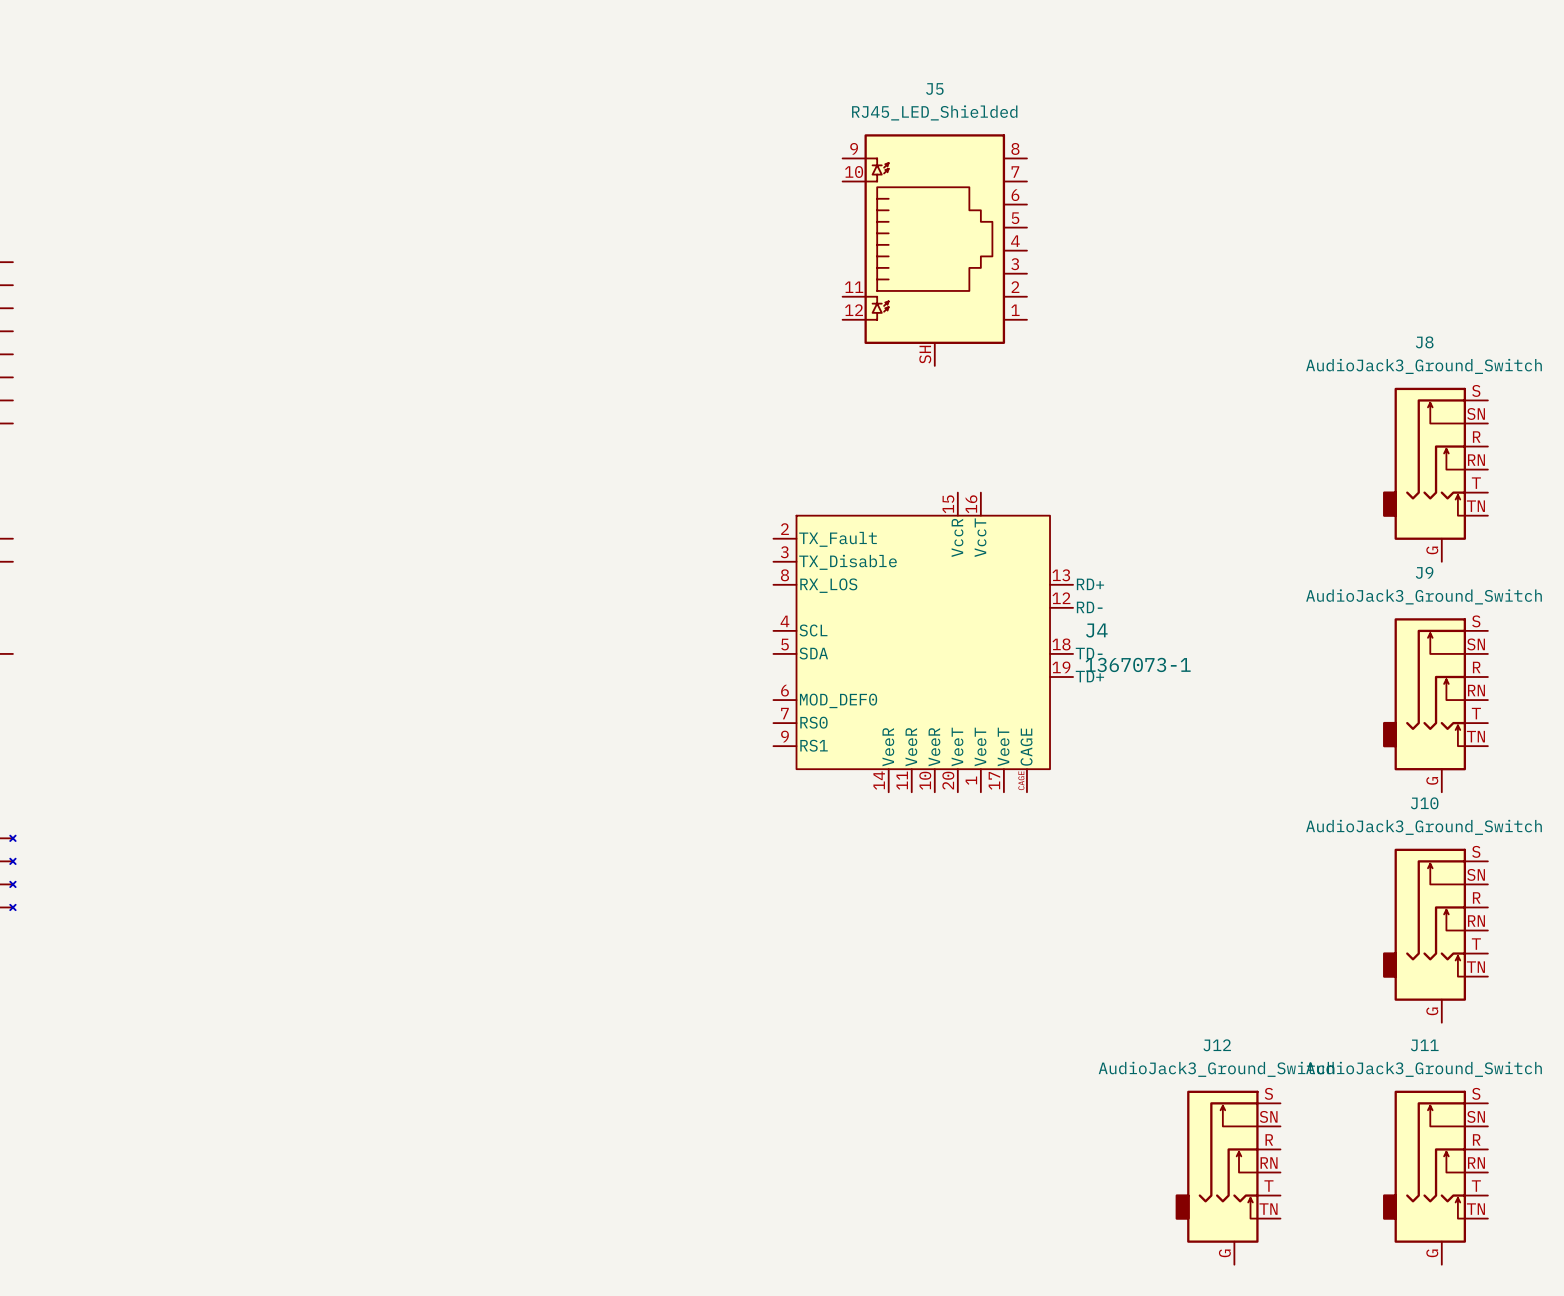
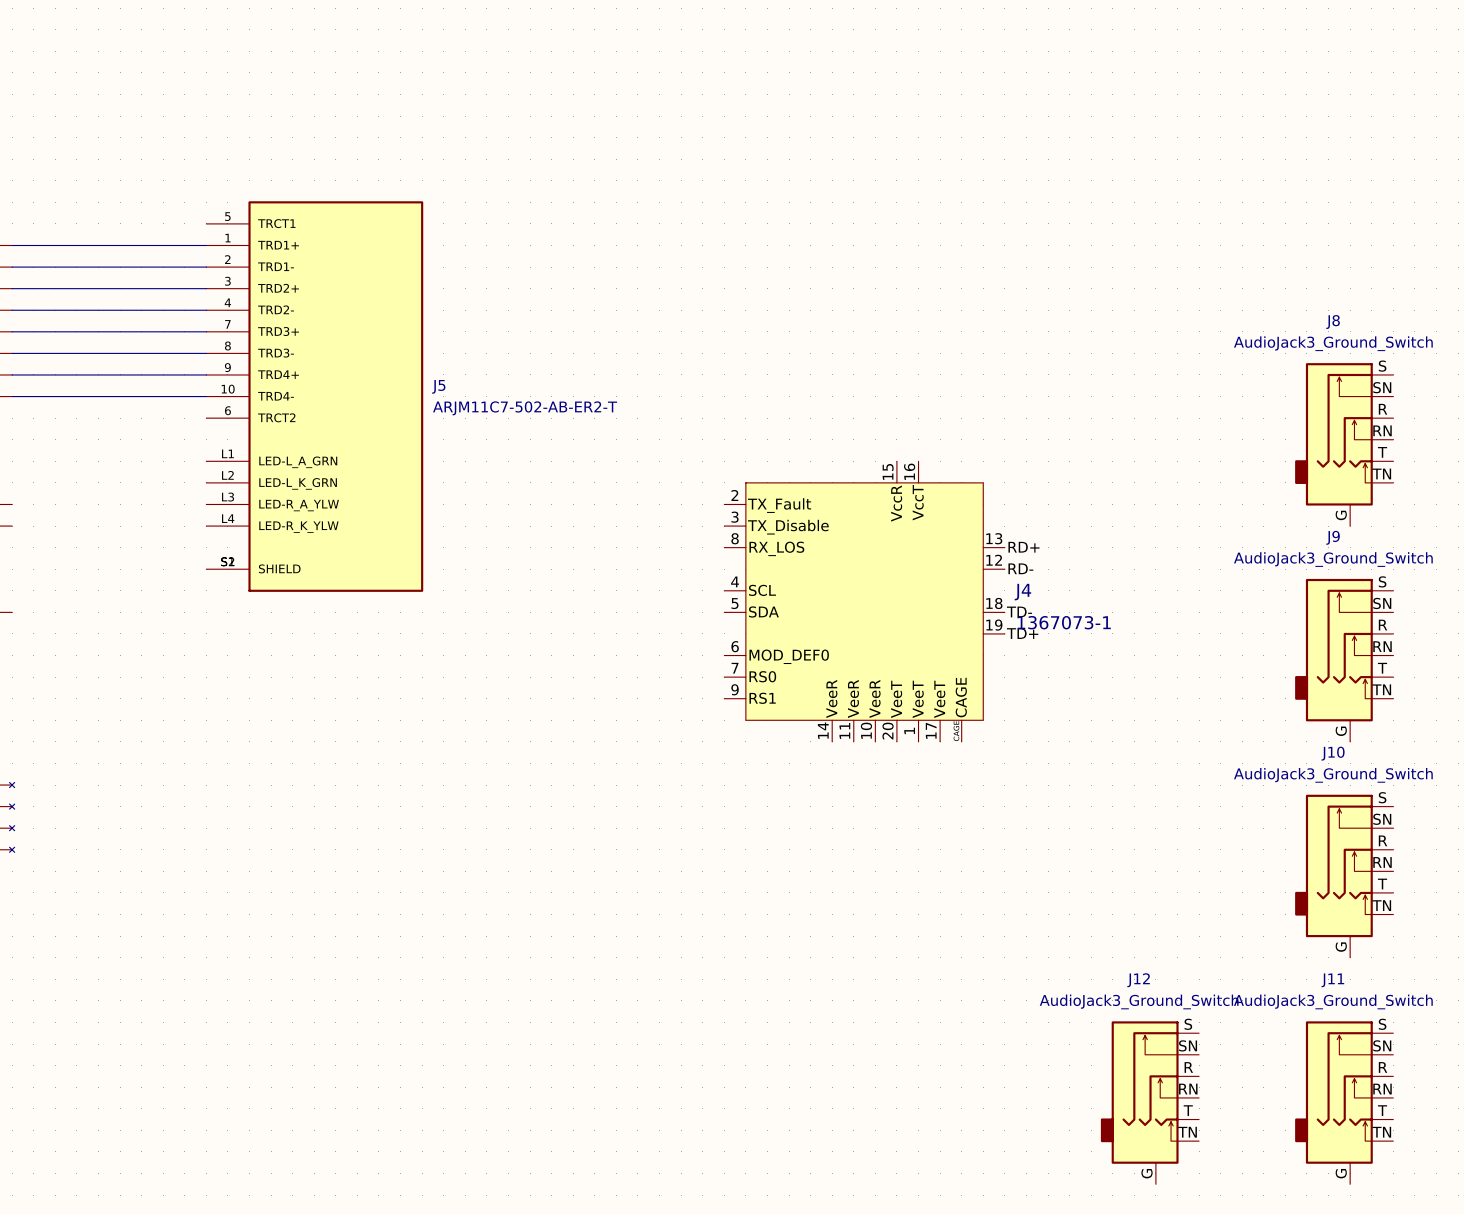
J5 name position: J5 (934, 88) -> J5 (438, 386)
J5 value: RJ45_LED_Shielded (934, 112) -> ARJM11C7-502-AB-ER2-T (525, 408)
J5 symbol: [842, 134, 1027, 366] -> [206, 201, 424, 592]
wire: none -> (12, 245) (206, 245)
wire: none -> (12, 267) (206, 267)
wire: none -> (12, 288) (206, 288)
wire: none -> (12, 310) (206, 310)
wire: none -> (12, 331) (206, 331)
wire: none -> (12, 353) (206, 353)
wire: none -> (12, 374) (206, 374)
wire: none -> (12, 396) (206, 396)

